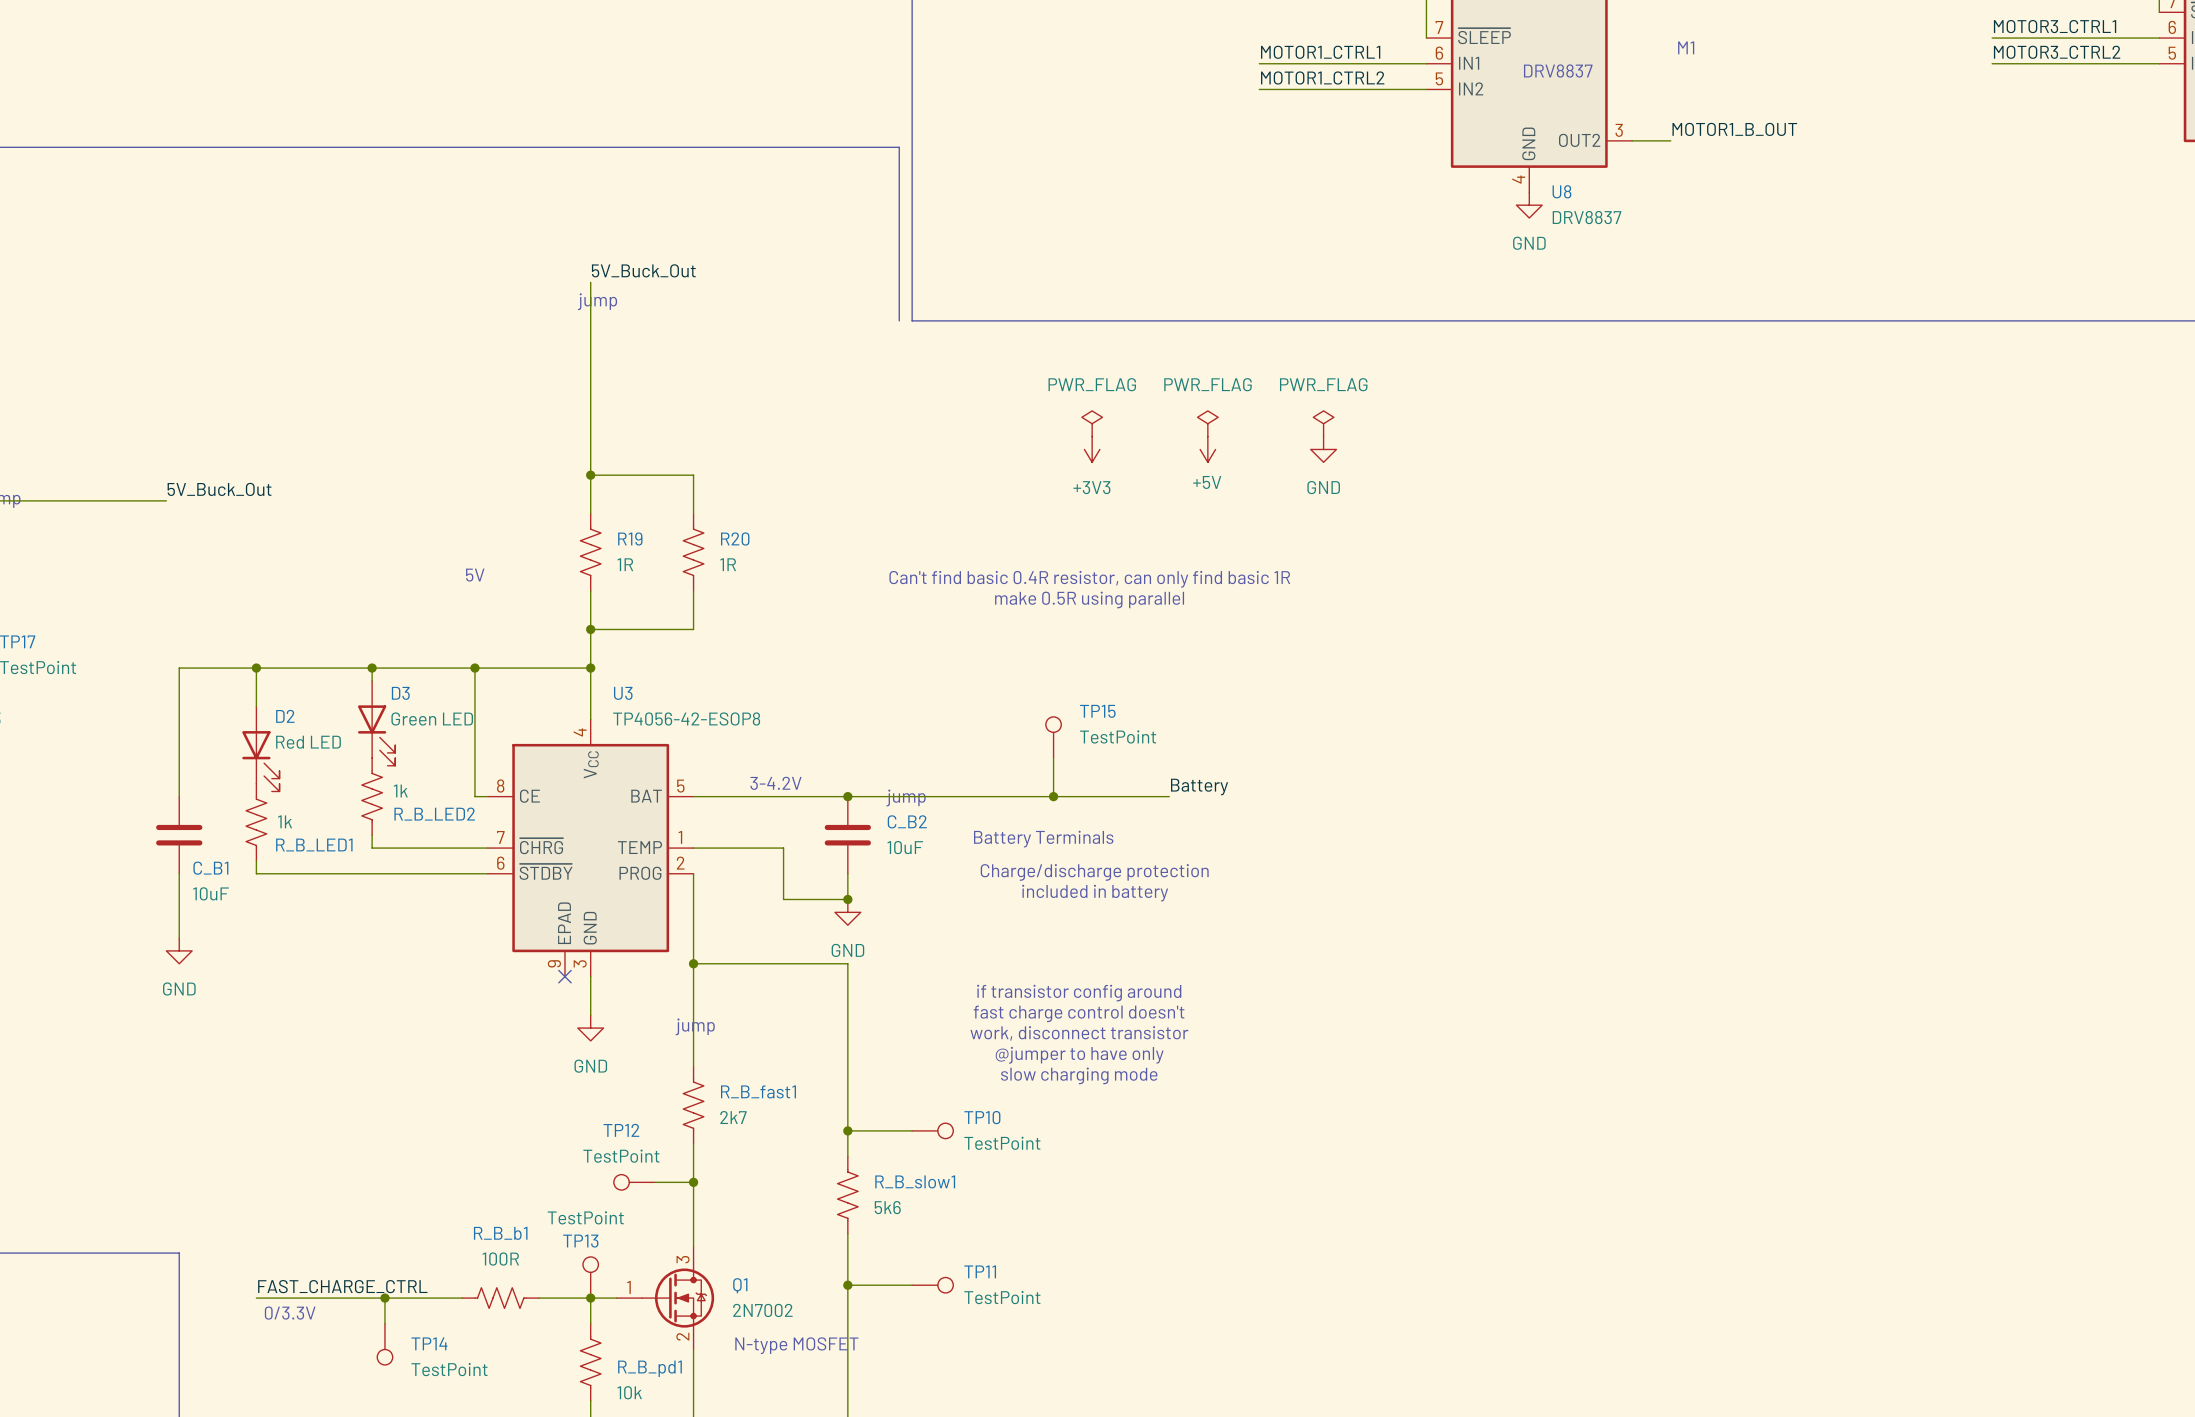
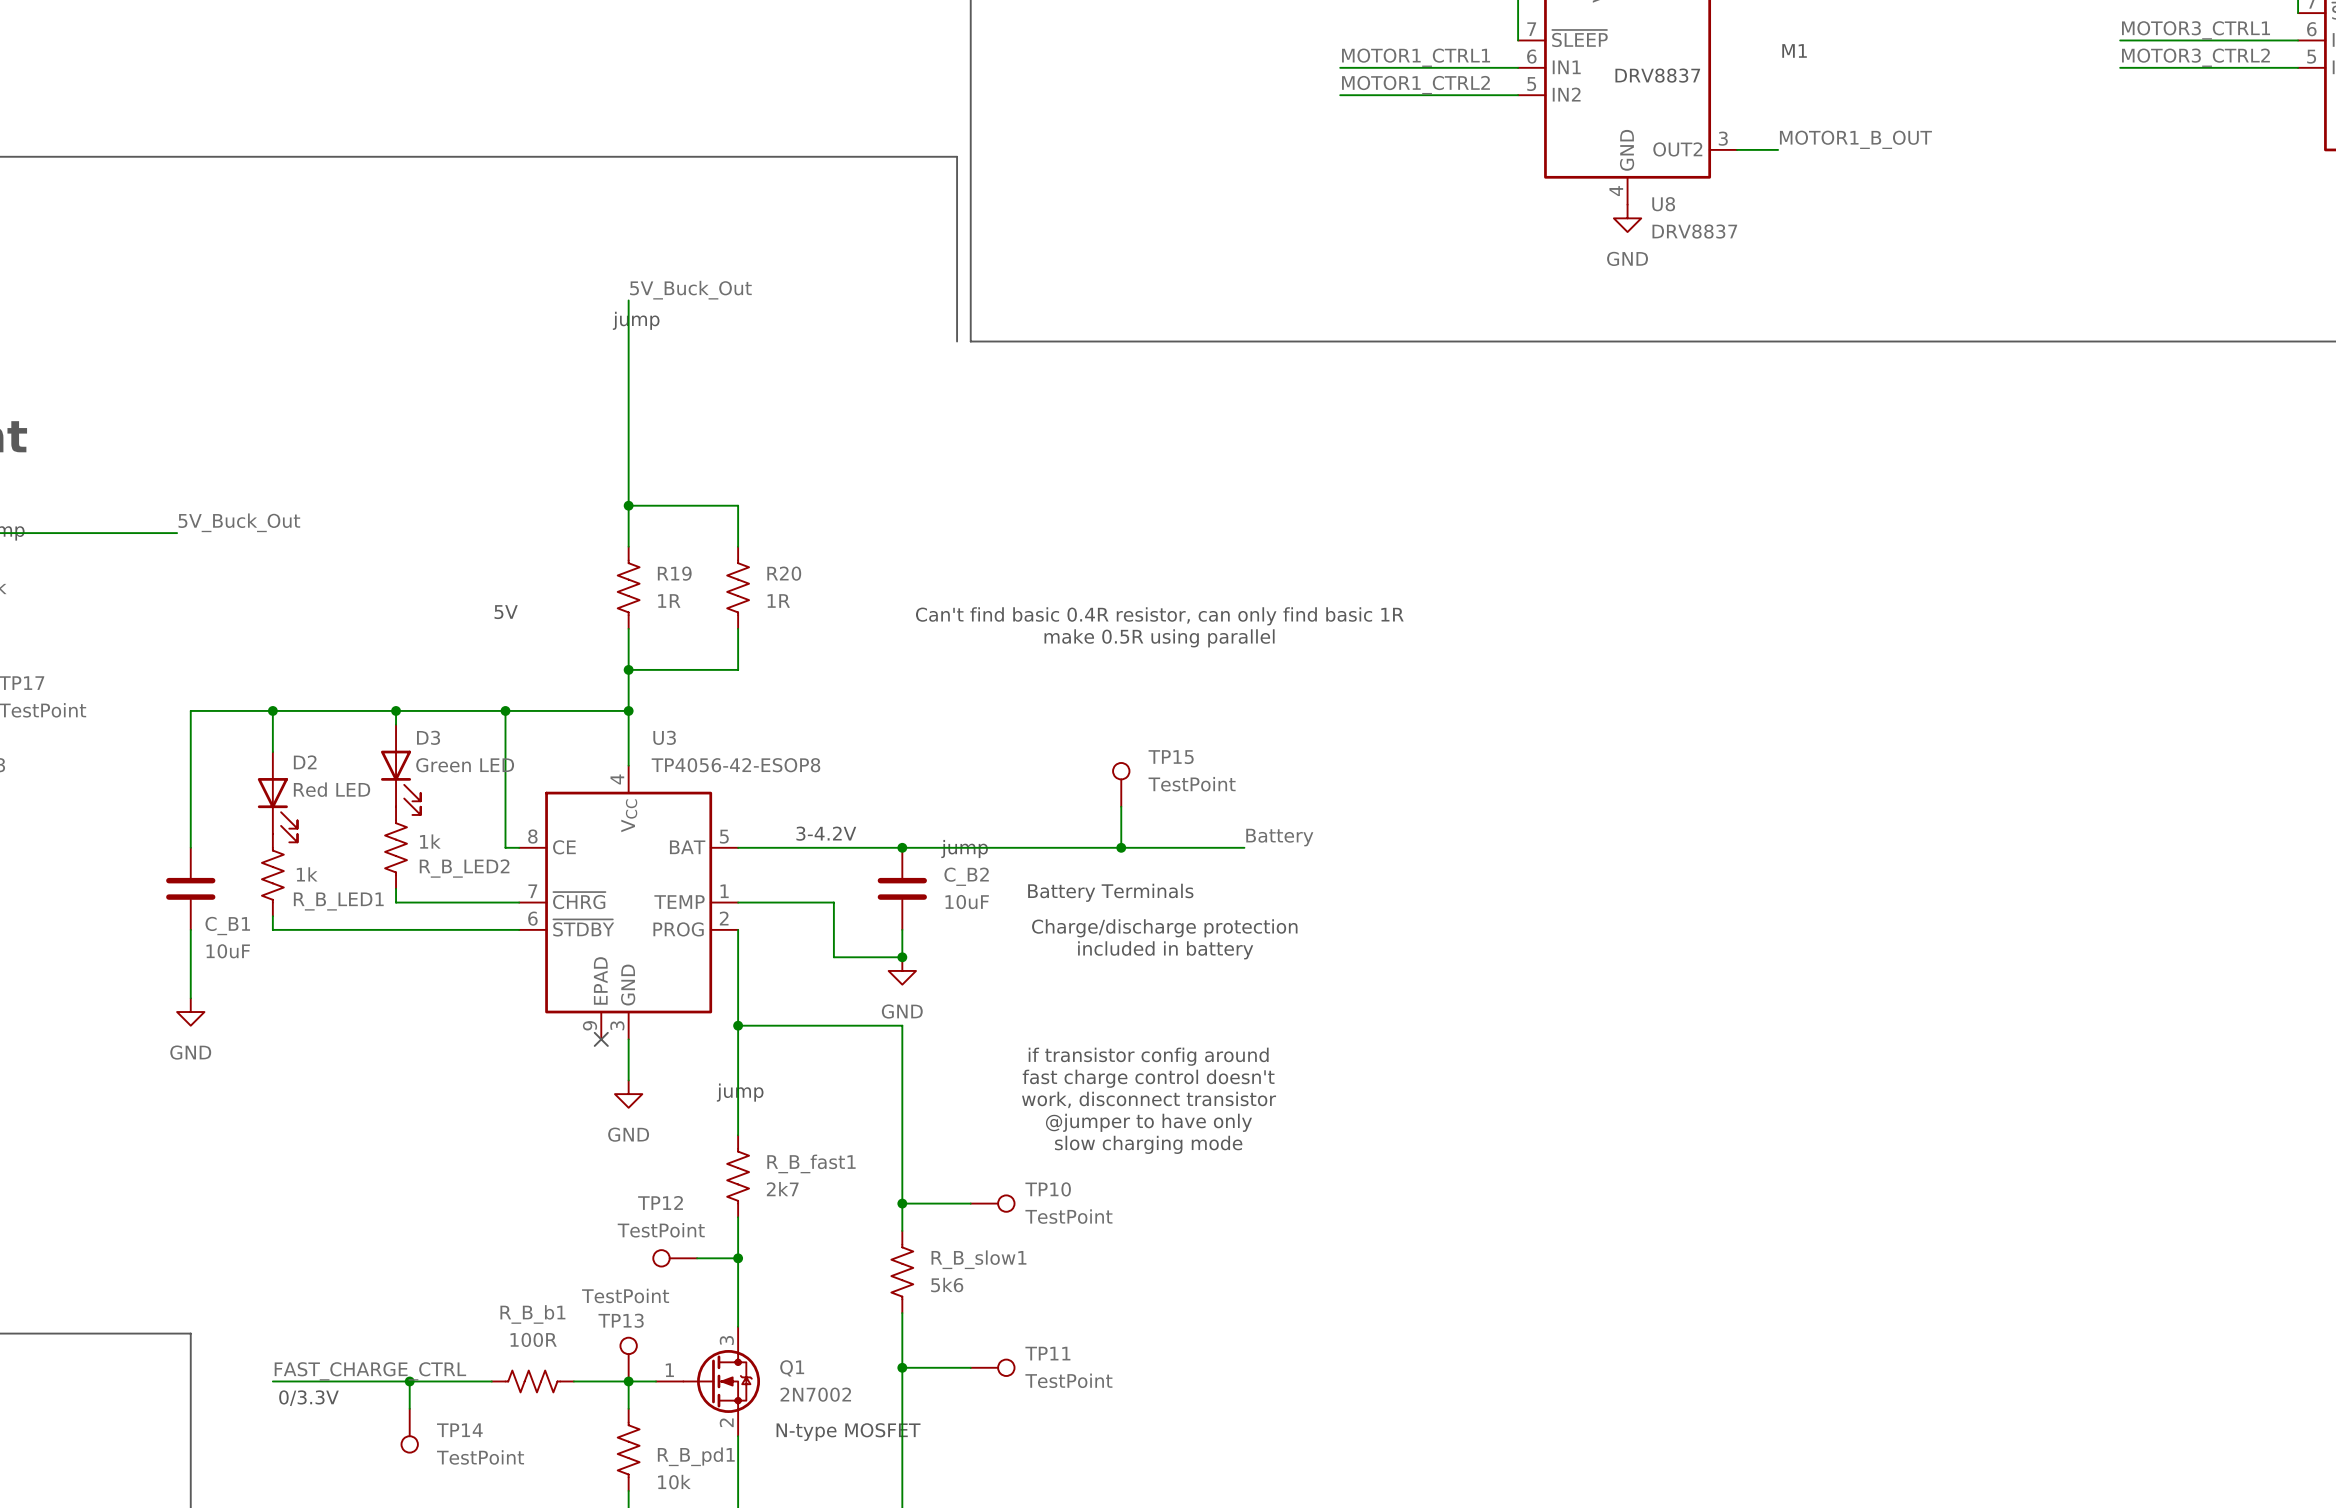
power symbol: PWR_FLAG (1092, 423) -> none
power symbol: PWR_FLAG (1207, 423) -> none
power symbol: PWR_FLAG (1323, 423) -> none
power symbol: +3V3 (1092, 449) -> none
power symbol: +5V (1207, 449) -> none
power symbol: GND (1323, 449) -> none

